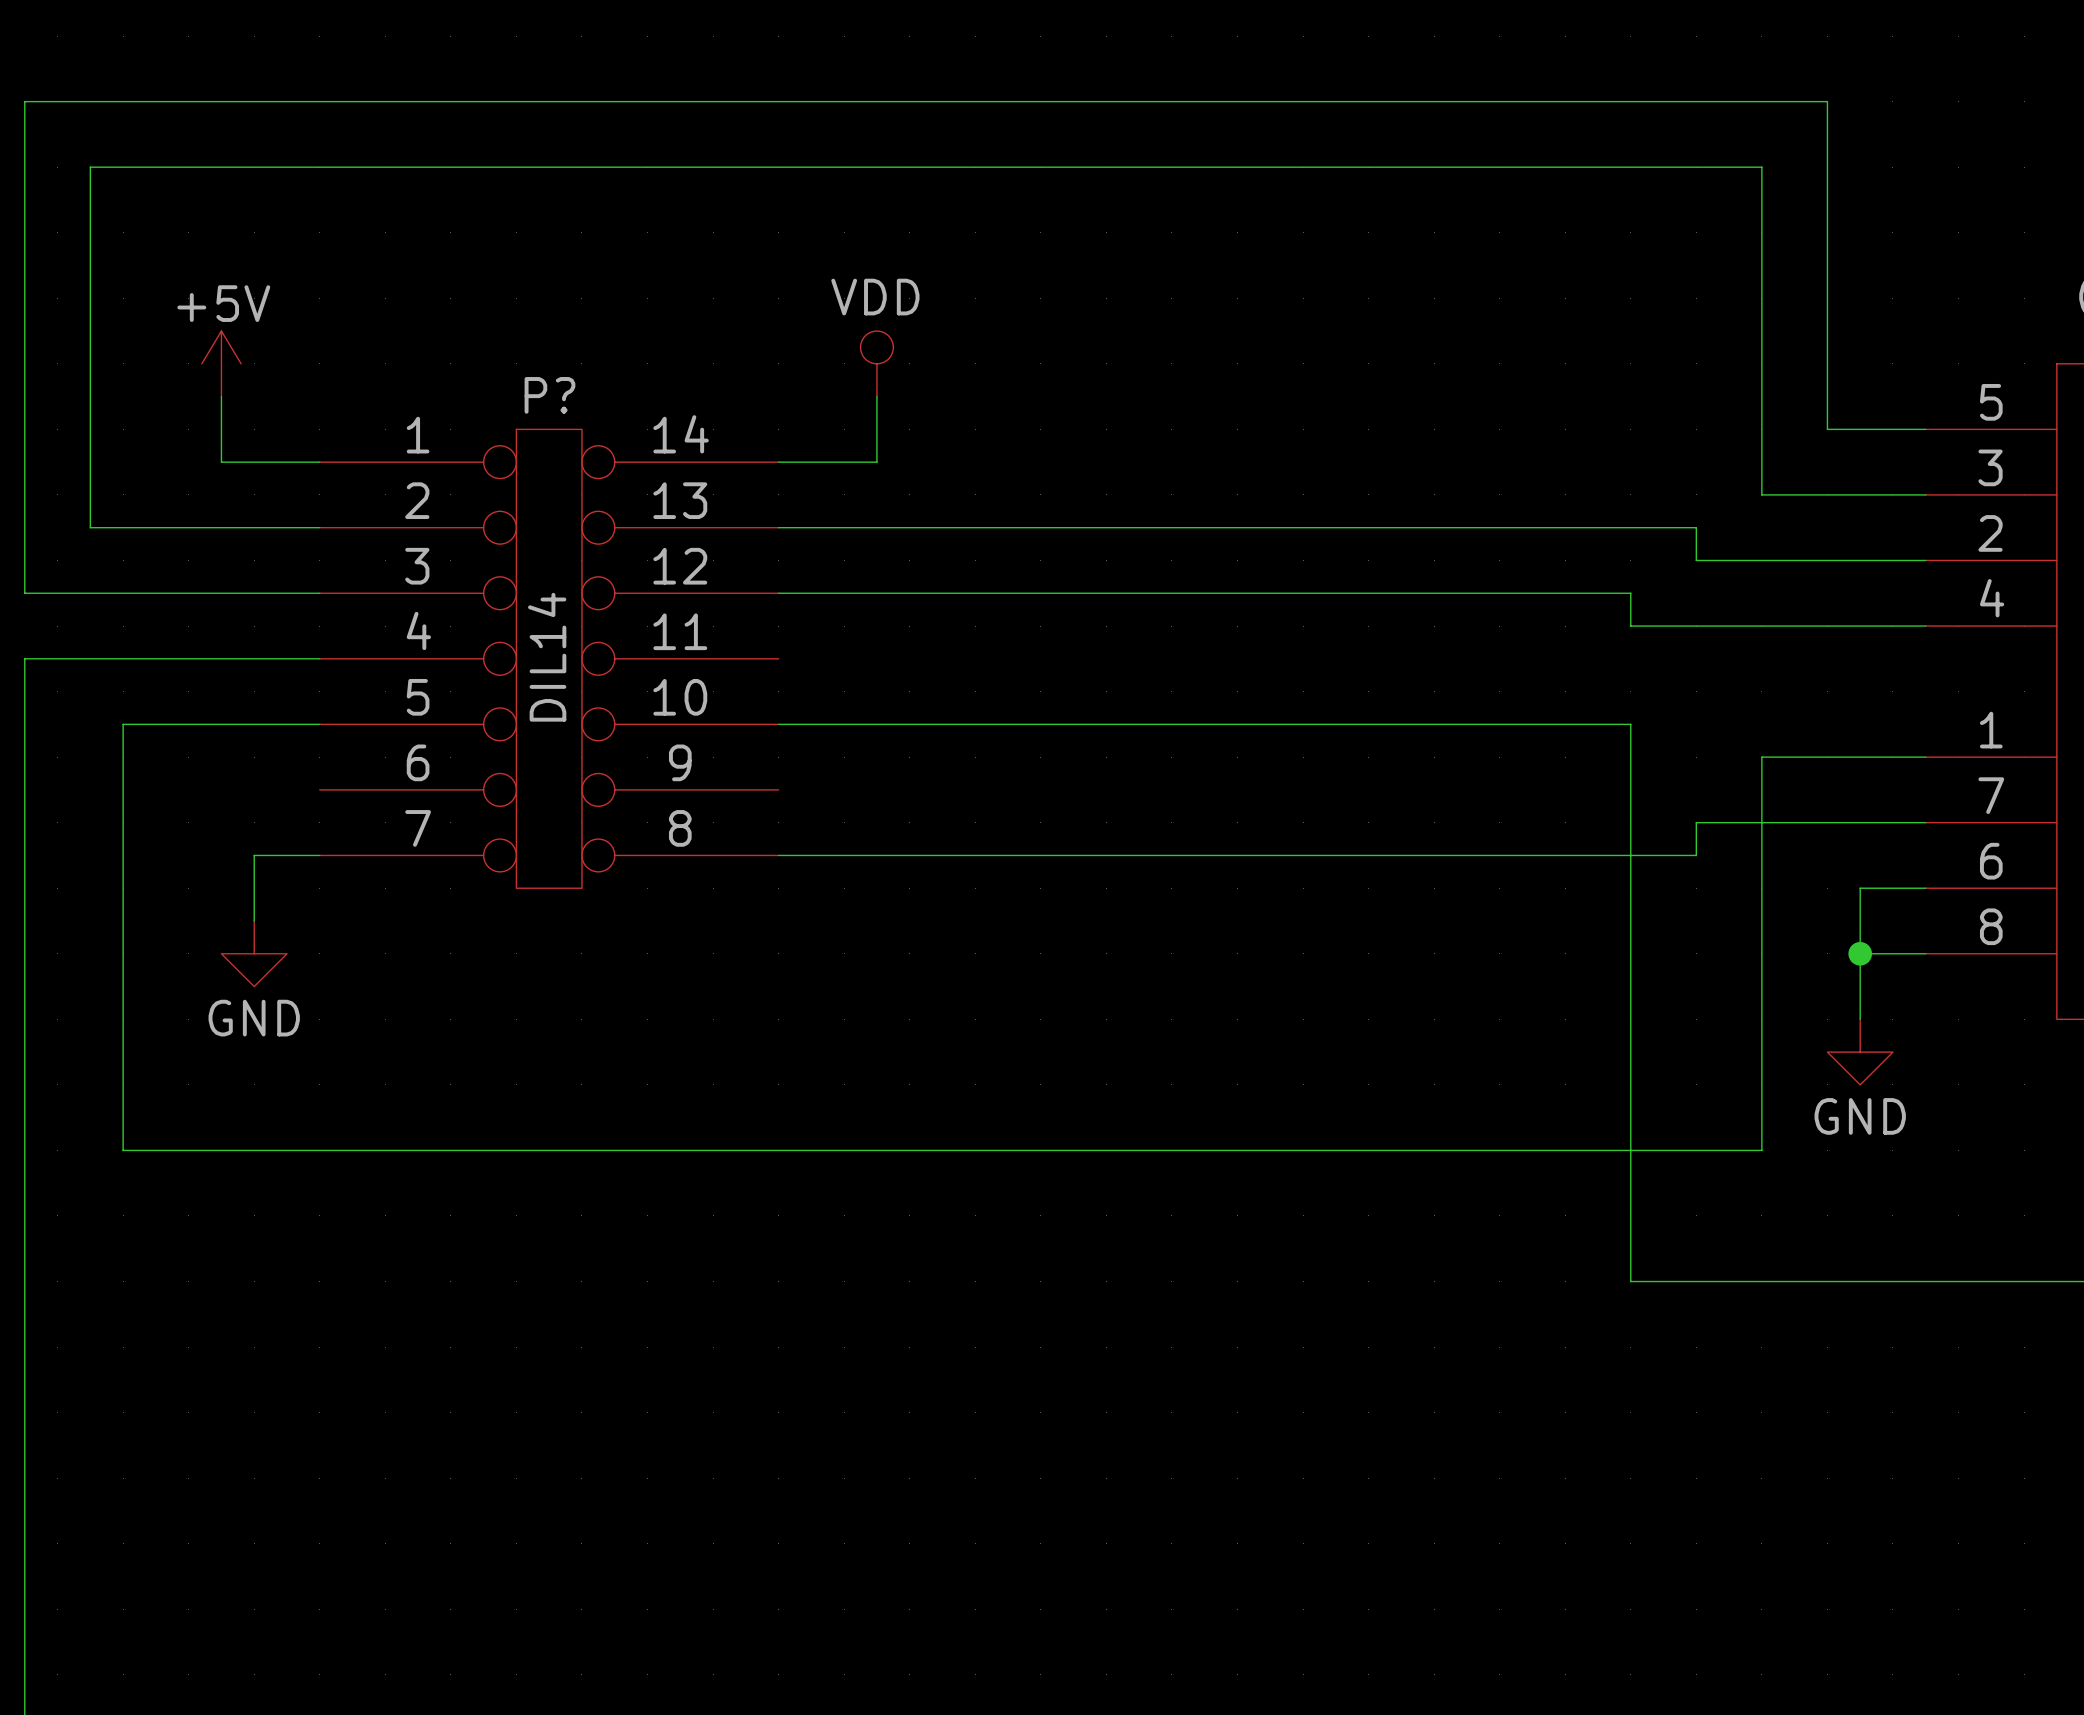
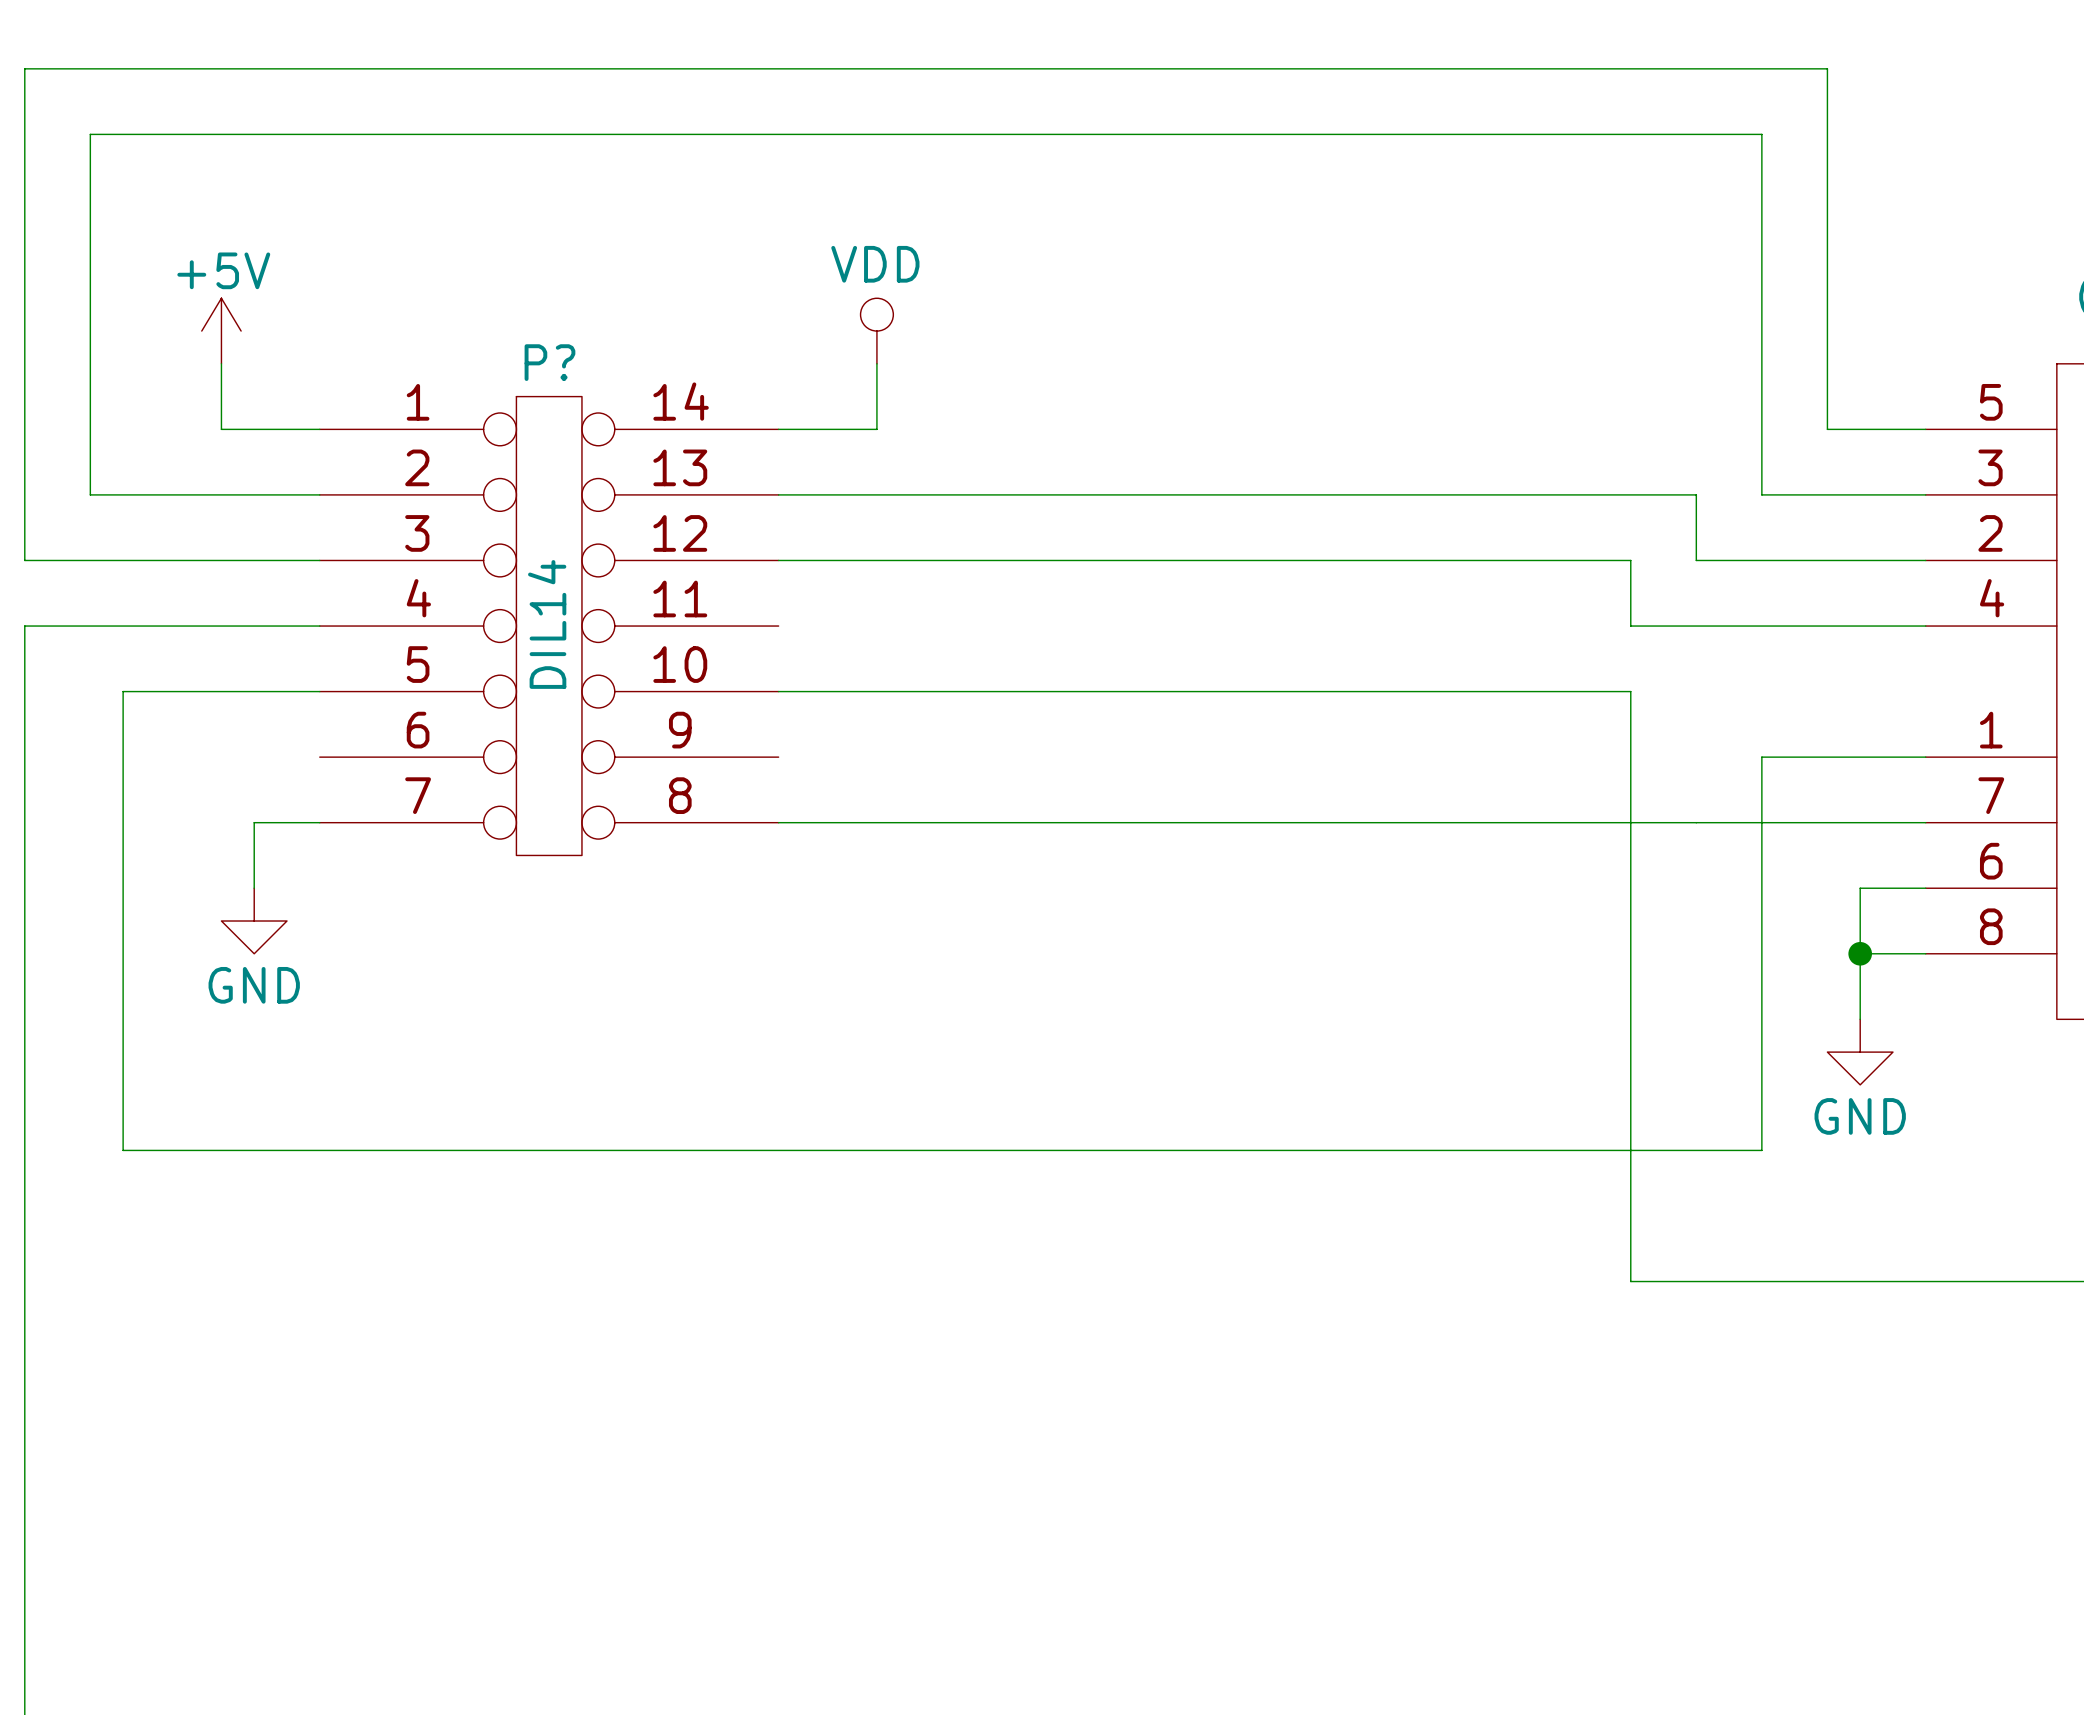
wire: (24, 101) (1827, 101) -> (24, 101) (24, 68) (1827, 68) (1827, 101)
wire: (90, 167) (1761, 167) -> (90, 167) (90, 134) (1761, 134) (1761, 167)
power symbol position: +5V (221, 363) -> +5V (221, 331)
power symbol position: VDD (876, 363) -> VDD (876, 331)
wire: (221, 429) (221, 462) (319, 462) -> (221, 429) (319, 429)
wire: (876, 429) (876, 462) (778, 462) -> (876, 429) (778, 429)
wire: (90, 494) (90, 527) (319, 527) -> (90, 494) (319, 494)
wire: (778, 527) (1696, 527) -> (778, 494) (1696, 494) (1696, 527)
wire: (24, 560) (24, 593) (319, 593) -> (24, 560) (319, 560)
wire: (778, 593) (1630, 593) -> (778, 560) (1630, 560) (1630, 593)
wire: (24, 658) (319, 658) -> (24, 658) (24, 626) (319, 626)
P? position: (549, 658) -> (549, 626)
wire: (123, 724) (319, 724) -> (123, 724) (123, 691) (319, 691)
wire: (778, 724) (1630, 724) -> (778, 691) (1630, 691) (1630, 724)
wire: (1696, 822) (1696, 855) (778, 855) -> (1696, 822) (778, 822)
wire: (254, 855) (319, 855) -> (254, 855) (254, 822) (319, 822)
power symbol position: GND (254, 953) -> GND (254, 921)

